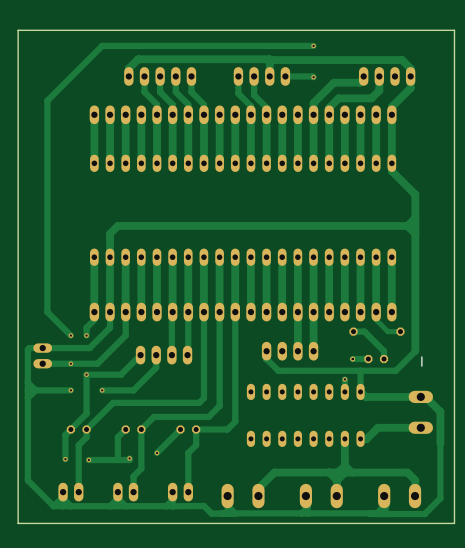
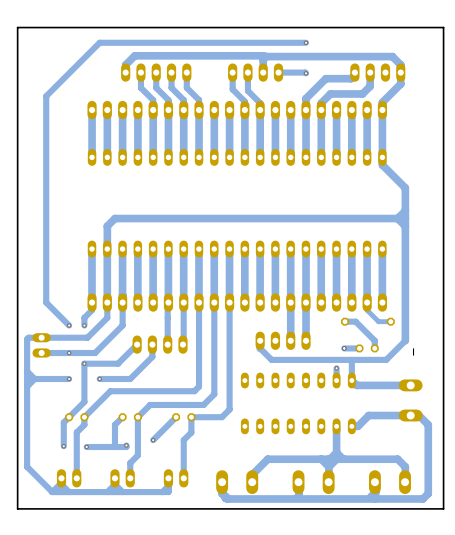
track: (425, 396) (440, 411) (440, 498) (424, 514) (369, 513) -> none
track: none -> (410, 415) (418, 415) (428, 424) (428, 493) (422, 498) (227, 498) (221, 493) (222, 478)
track: (172, 506) (203, 505) (211, 513) (234, 513) -> none

